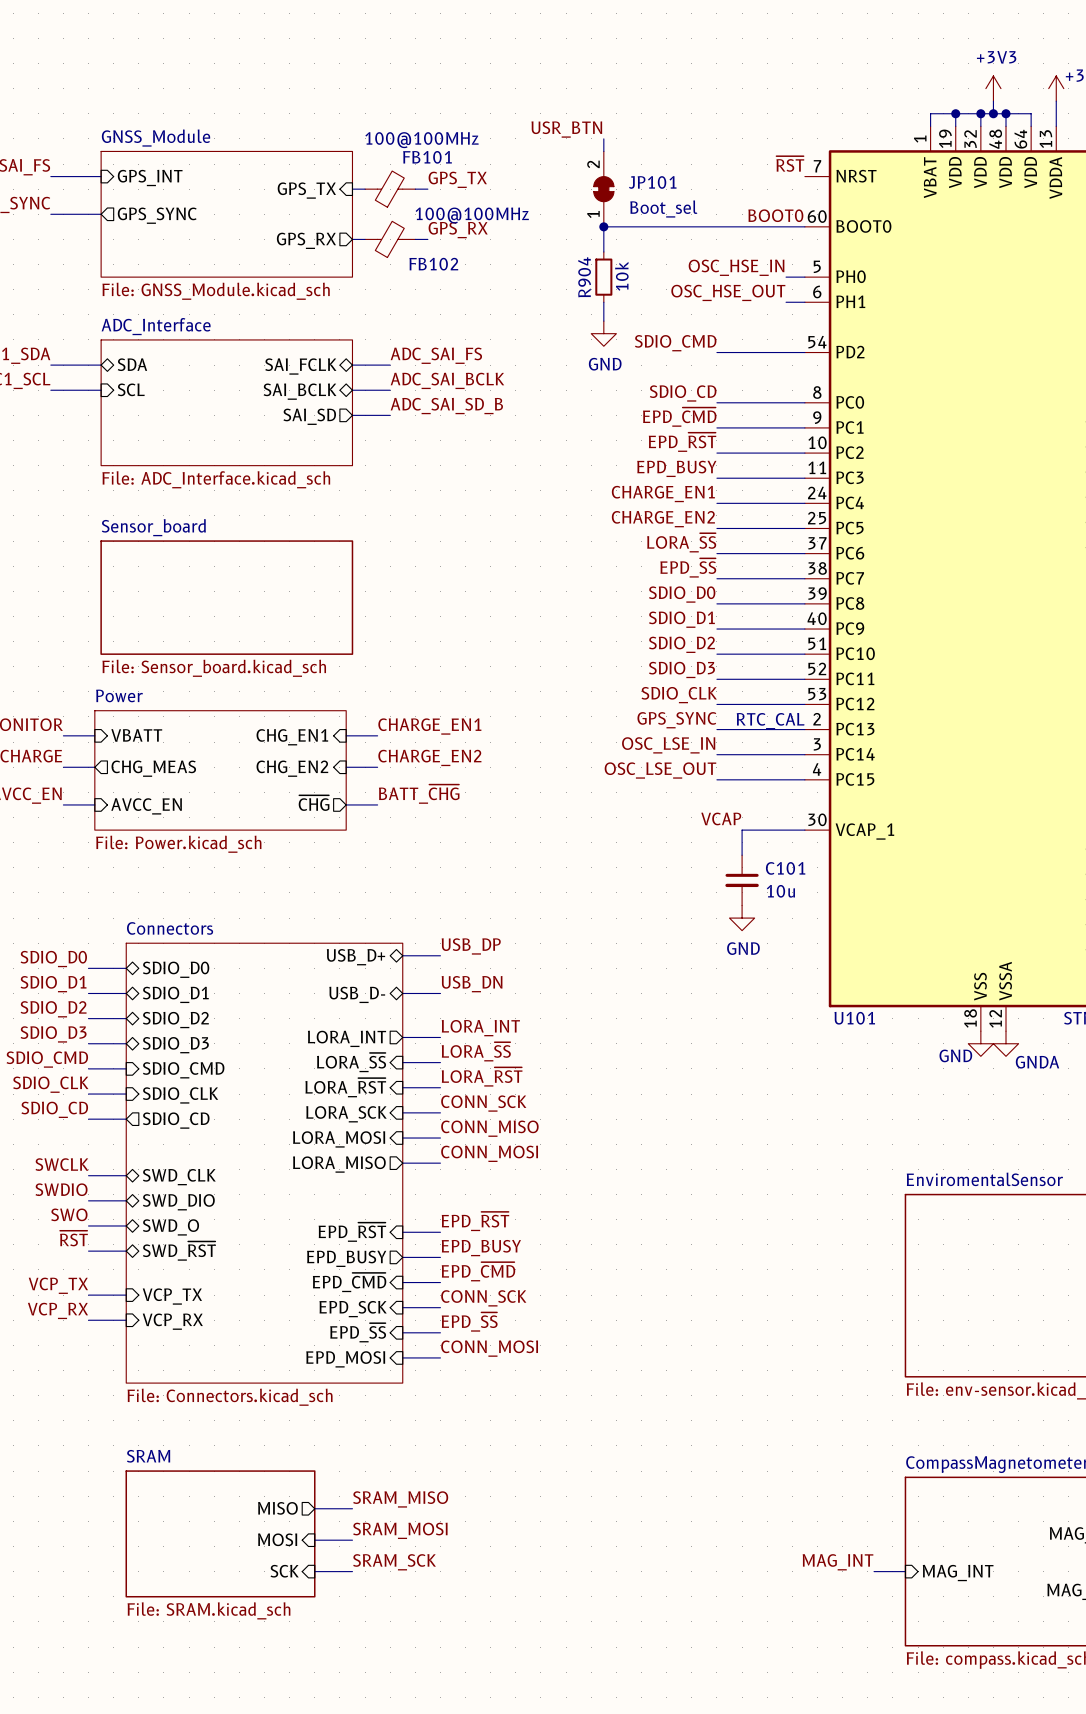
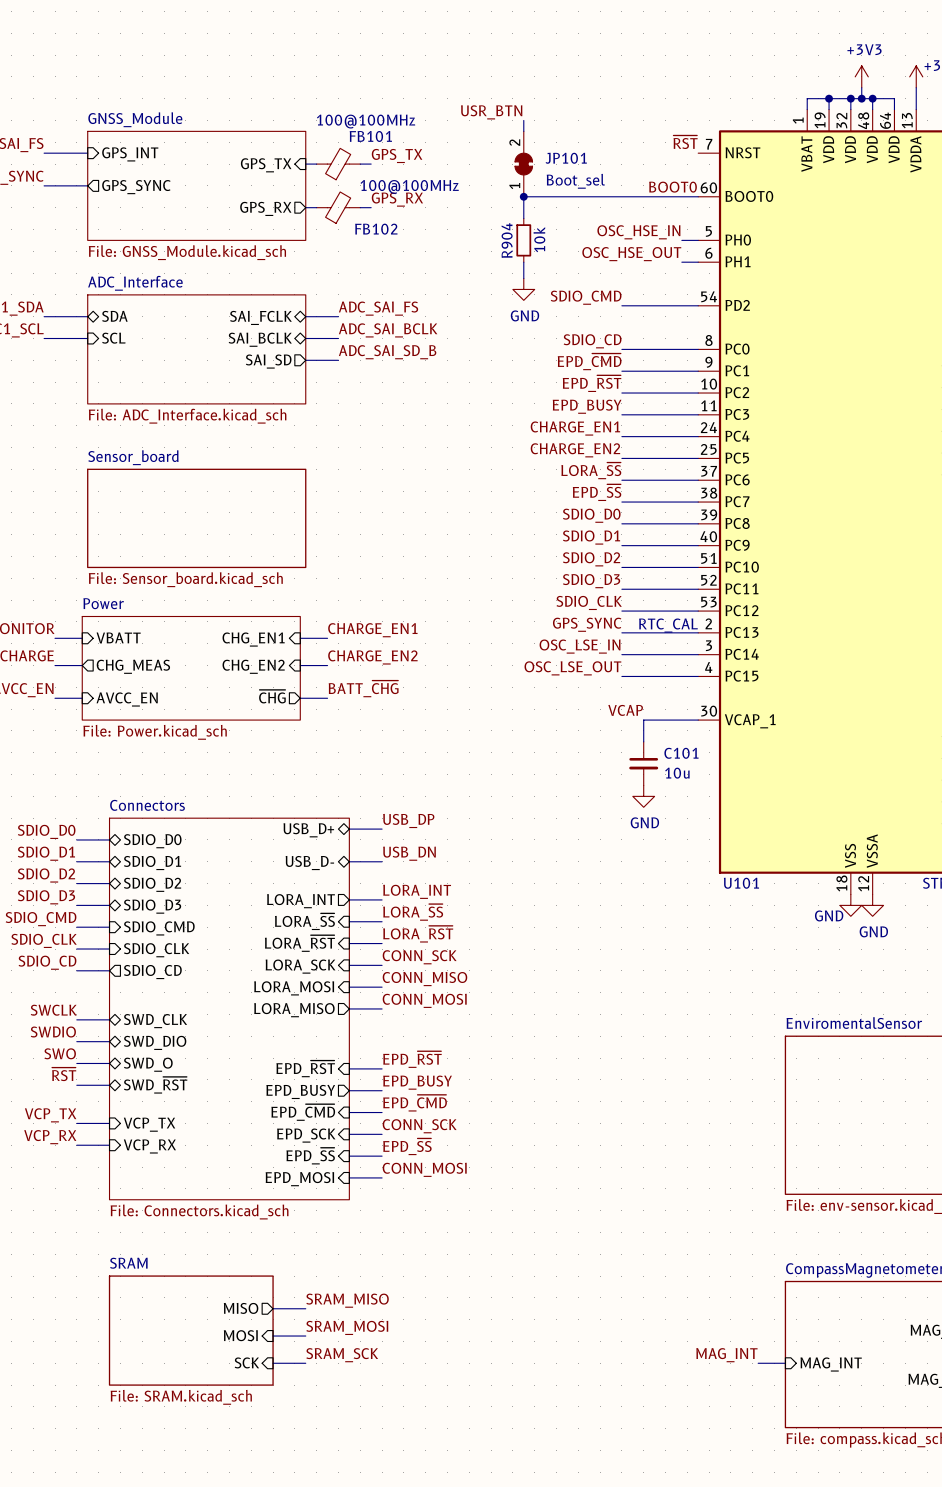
power symbol: GNDA (1006, 1043) -> GND (872, 905)

